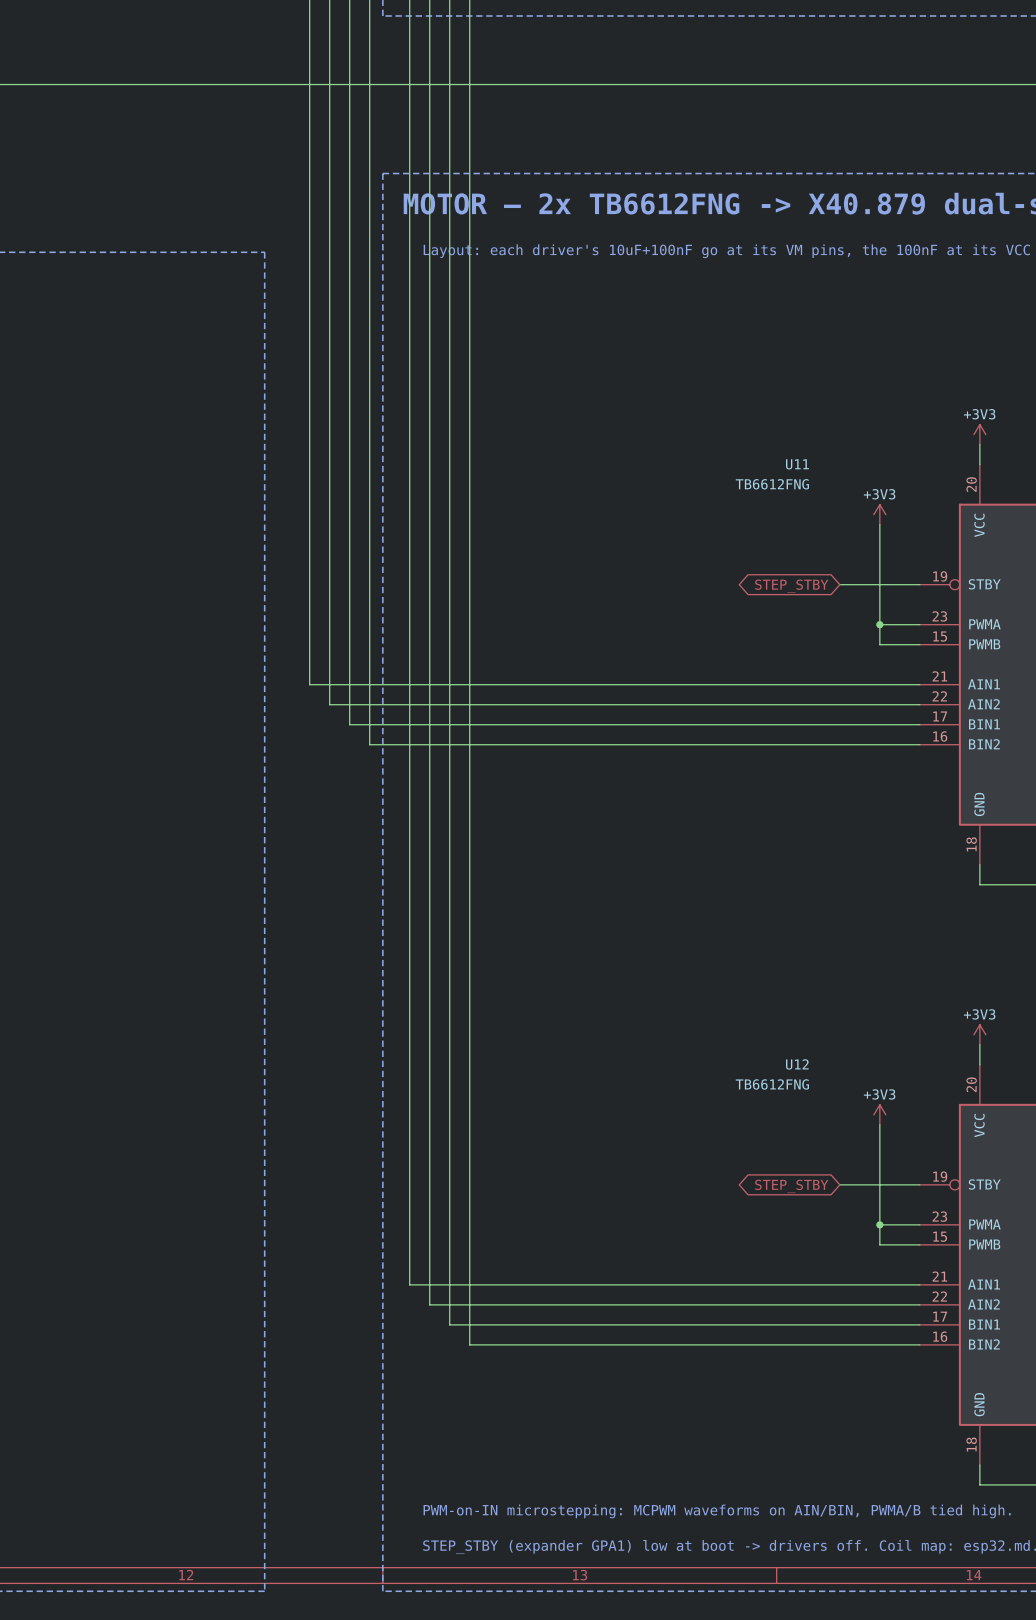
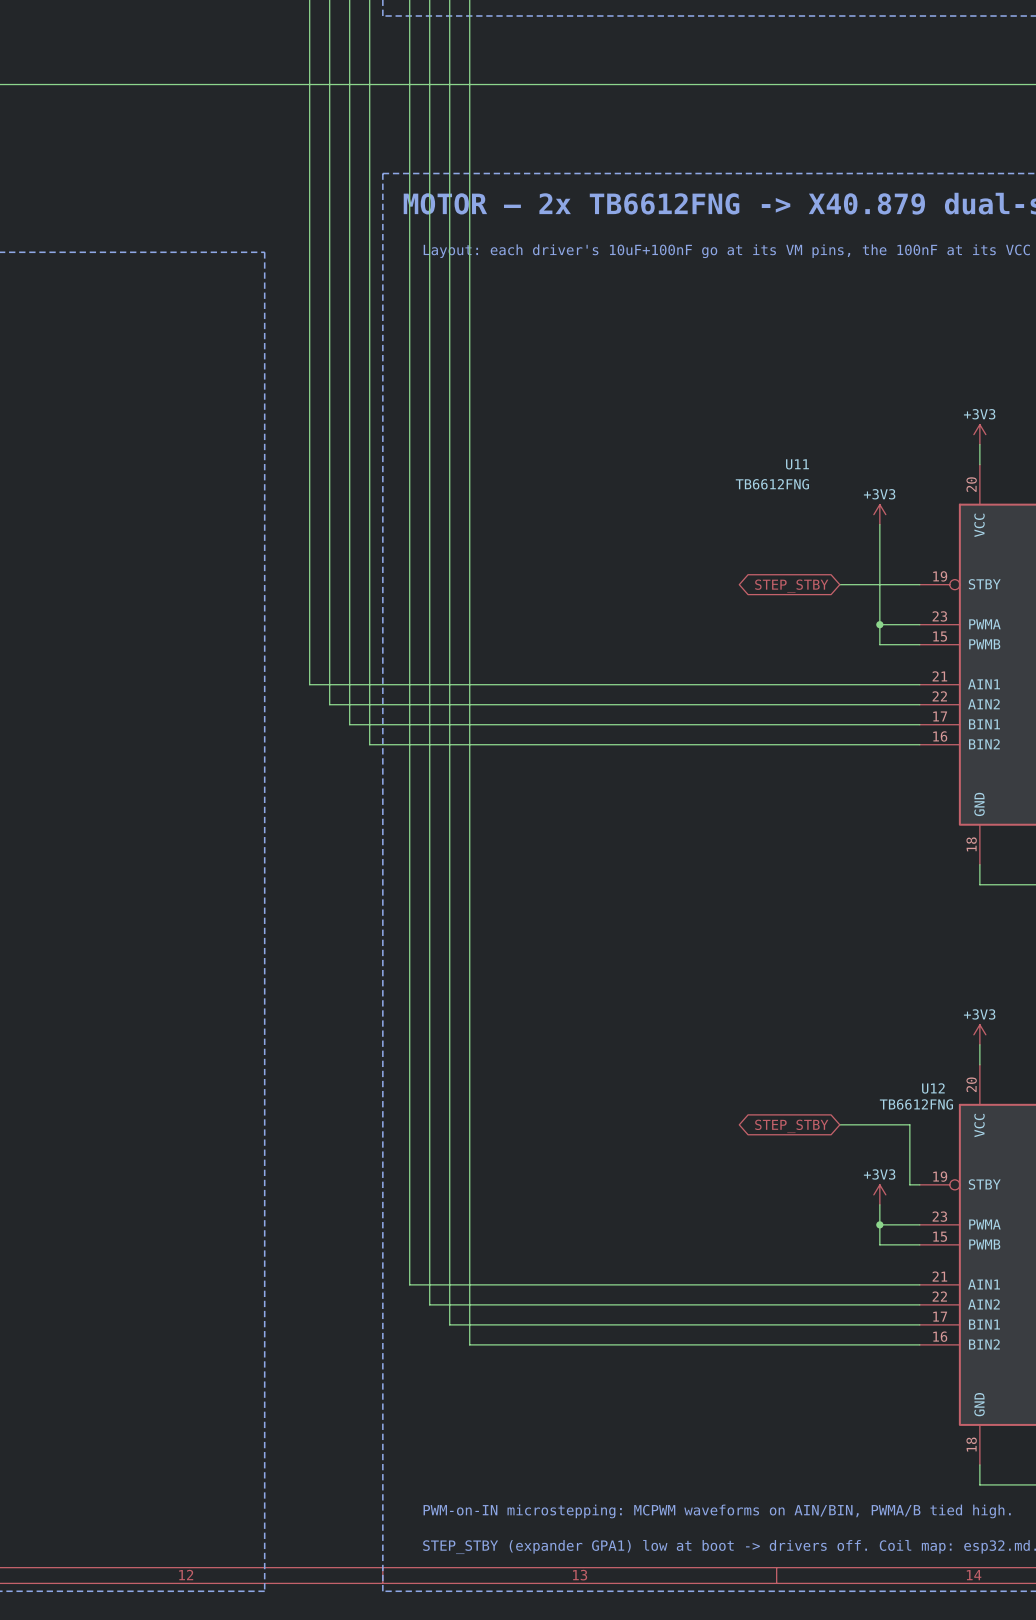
U12 name position: U12 (797, 1064) -> U12 (933, 1088)
U12 value position: TB6612FNG (772, 1084) -> TB6612FNG (916, 1104)
power symbol position: +3V3 (879, 1114) -> +3V3 (879, 1194)
wire: (879, 1124) (879, 1204) -> none
wire: (839, 1184) (909, 1184) -> (839, 1124) (909, 1124) (909, 1184)
global label position: STEP_STBY (791, 1186) -> STEP_STBY (791, 1126)

